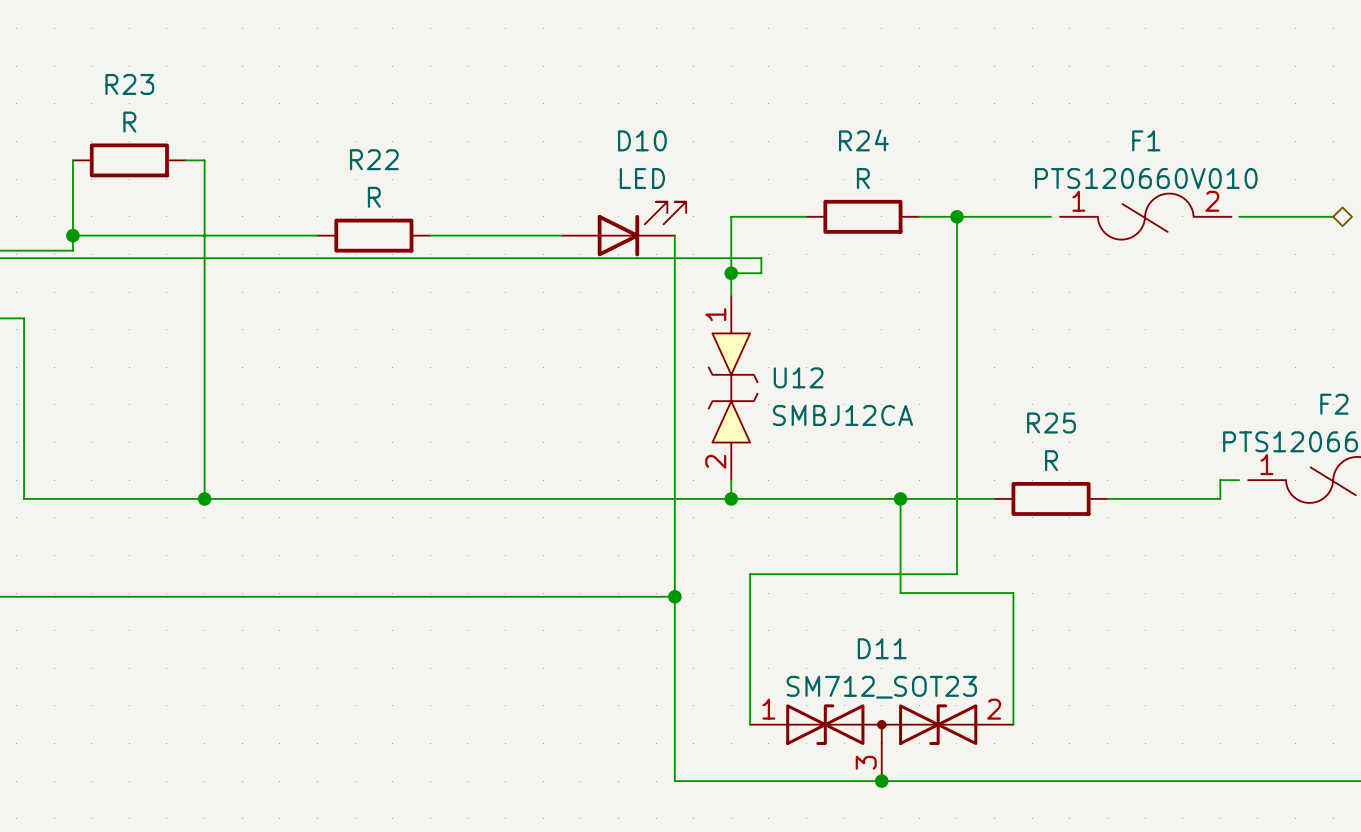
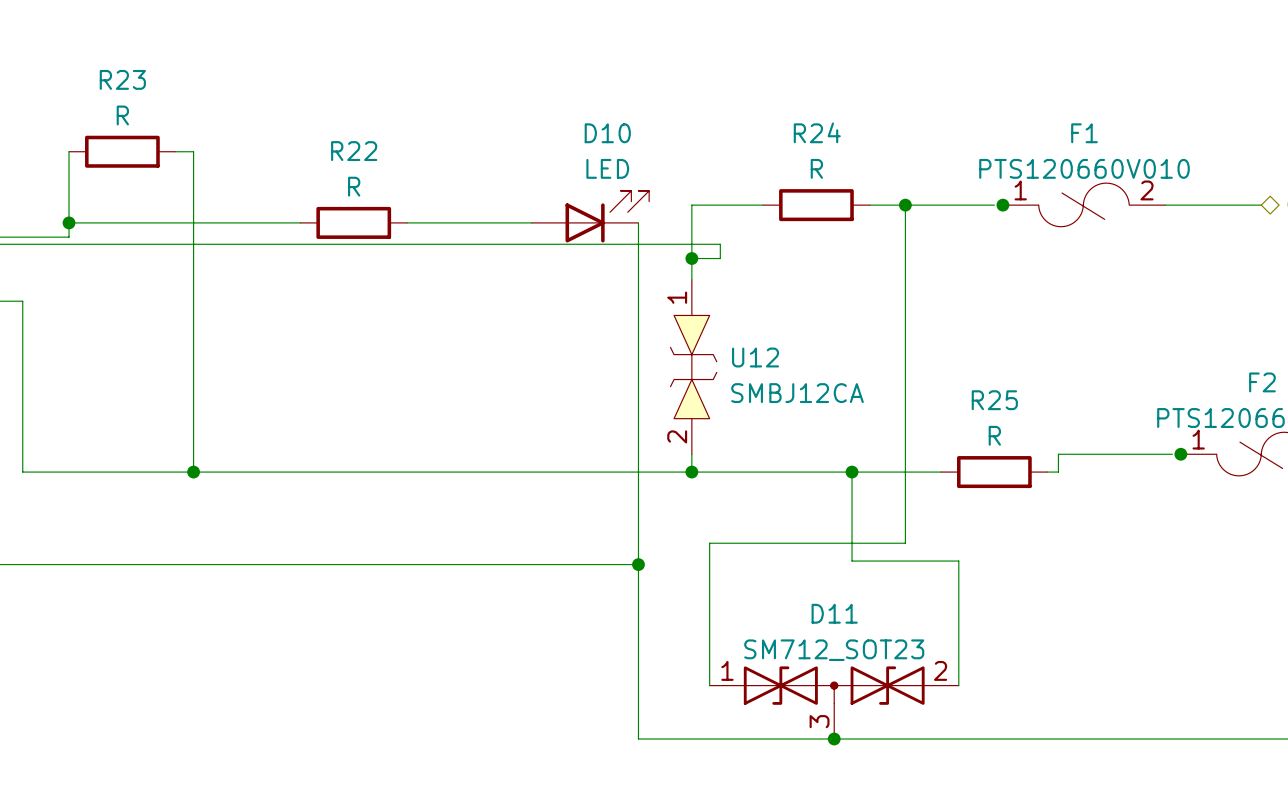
junction: none -> (1002, 205)
wire: none -> (1165, 205) (1172, 205)
wire: (1220, 480) (1220, 498) (1118, 498) -> (1154, 454) (1058, 454) (1058, 472)
junction: none -> (1180, 454)

